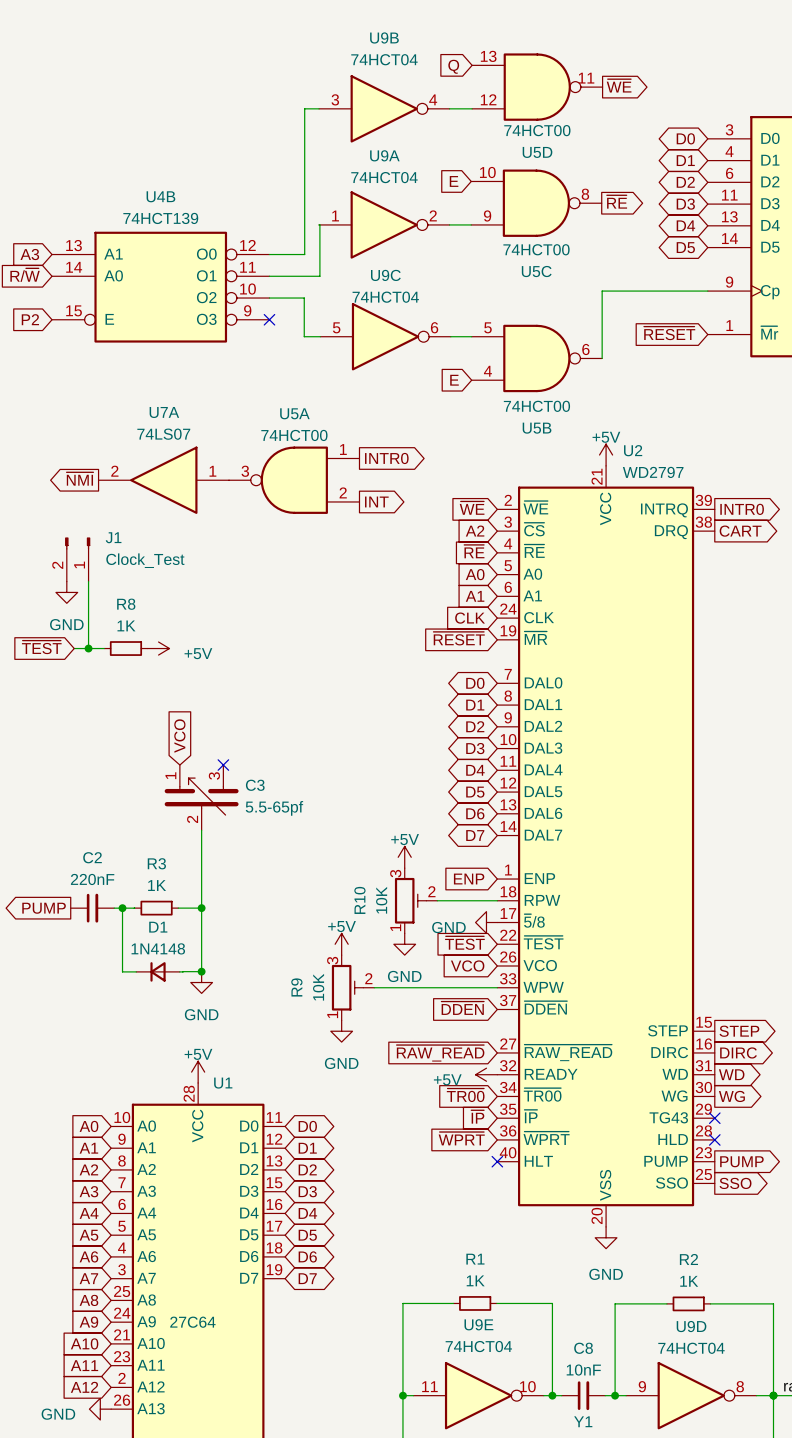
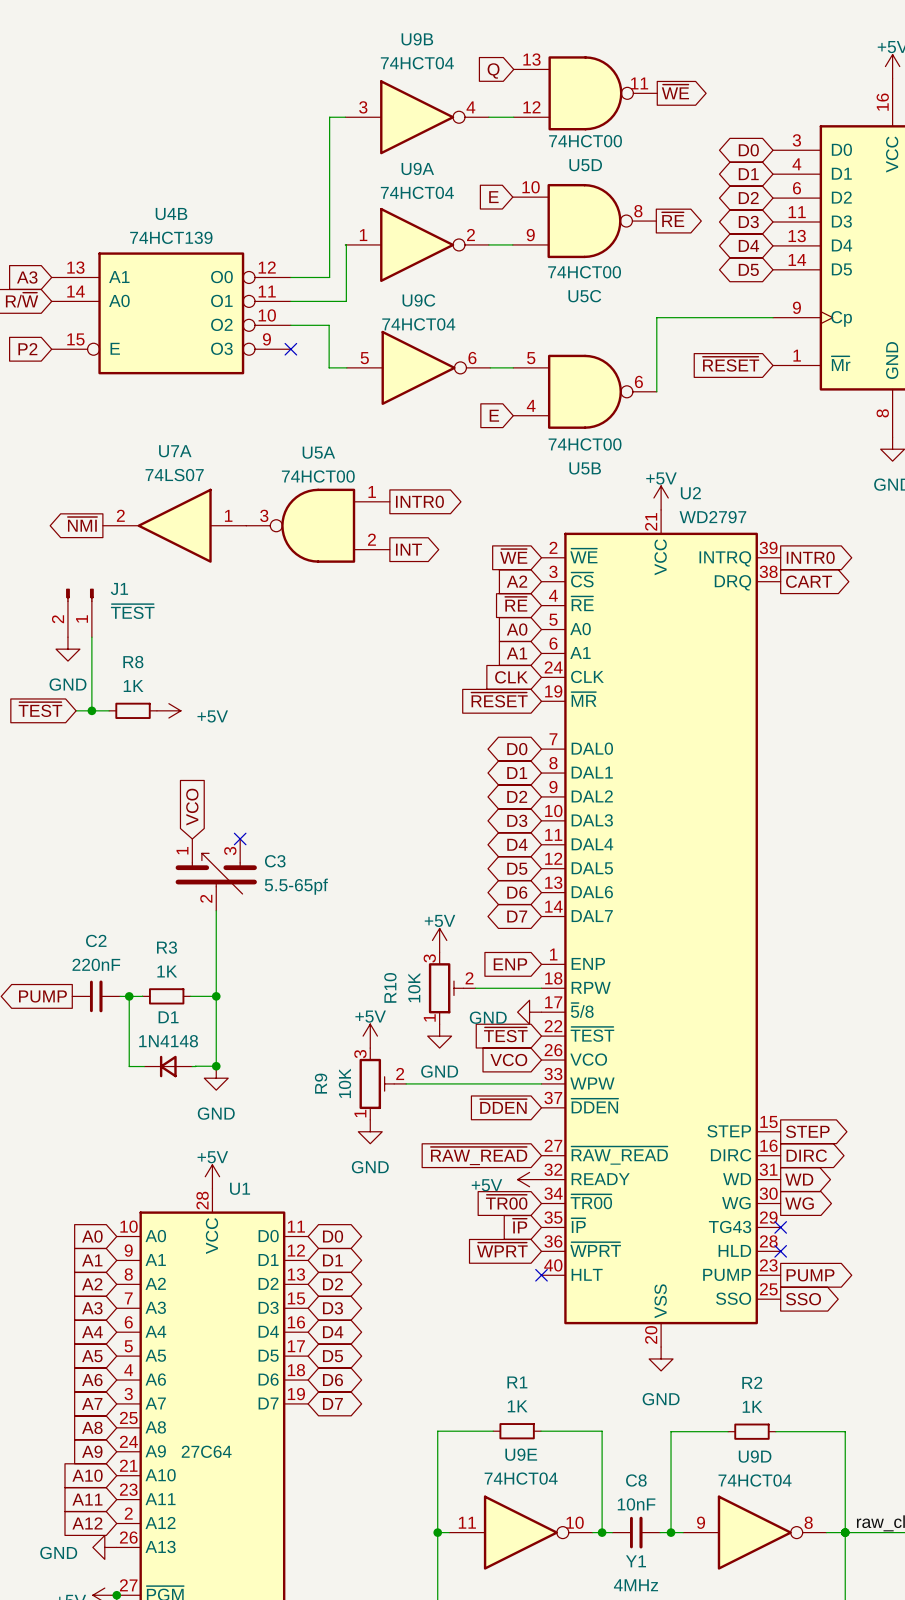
J1 value: Clock_Test (145, 560) -> ~{TEST} (132, 611)

